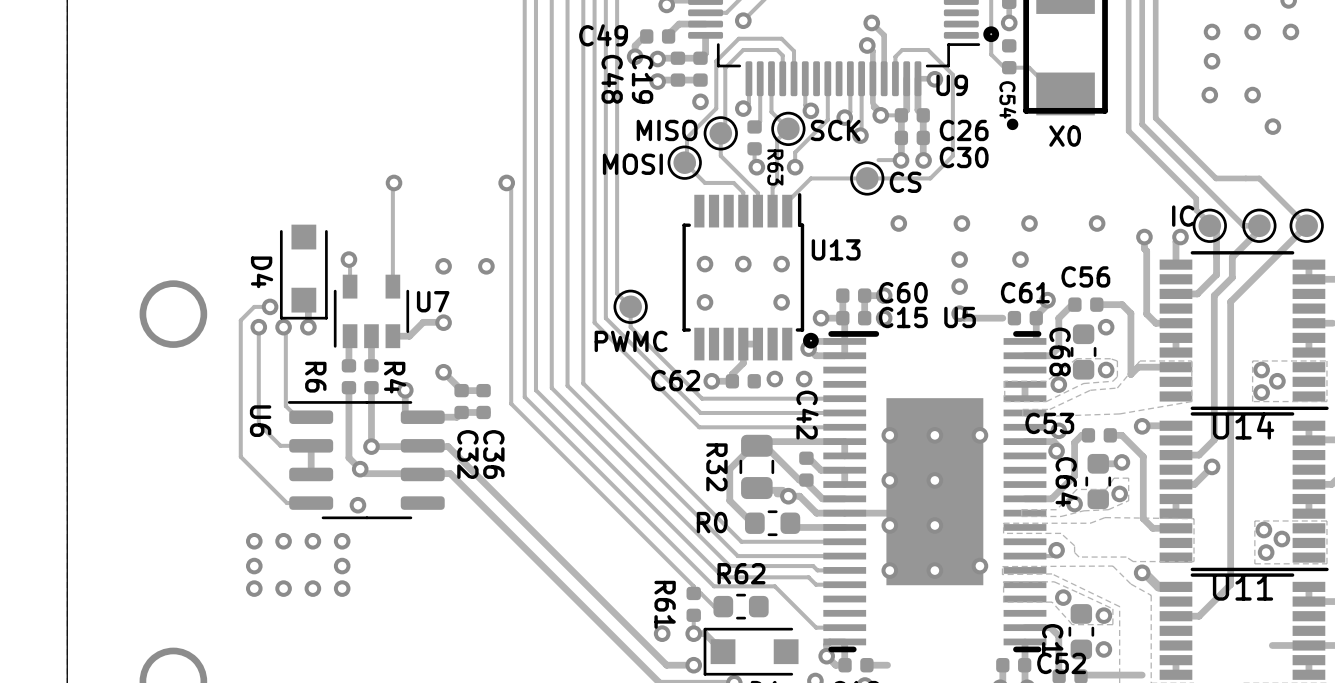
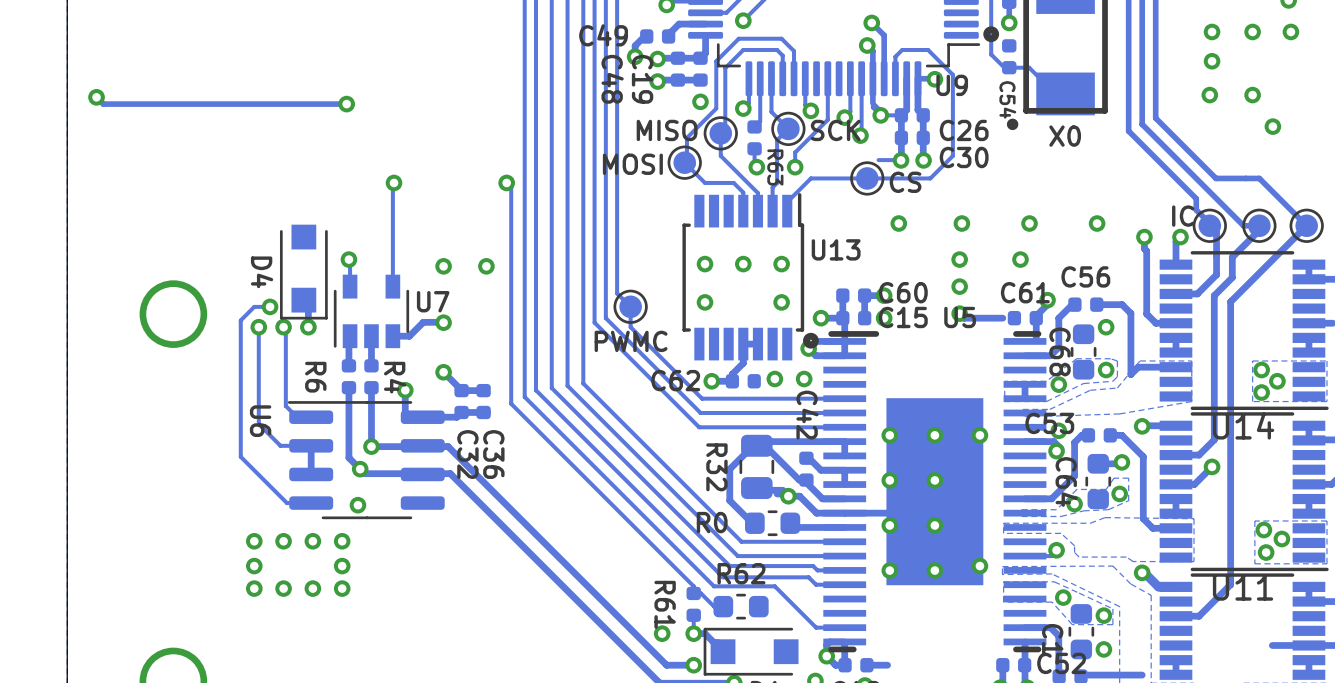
track: none -> (96, 97) (103, 104) (346, 104)
via: none -> (96, 97)
via: none -> (346, 104)

